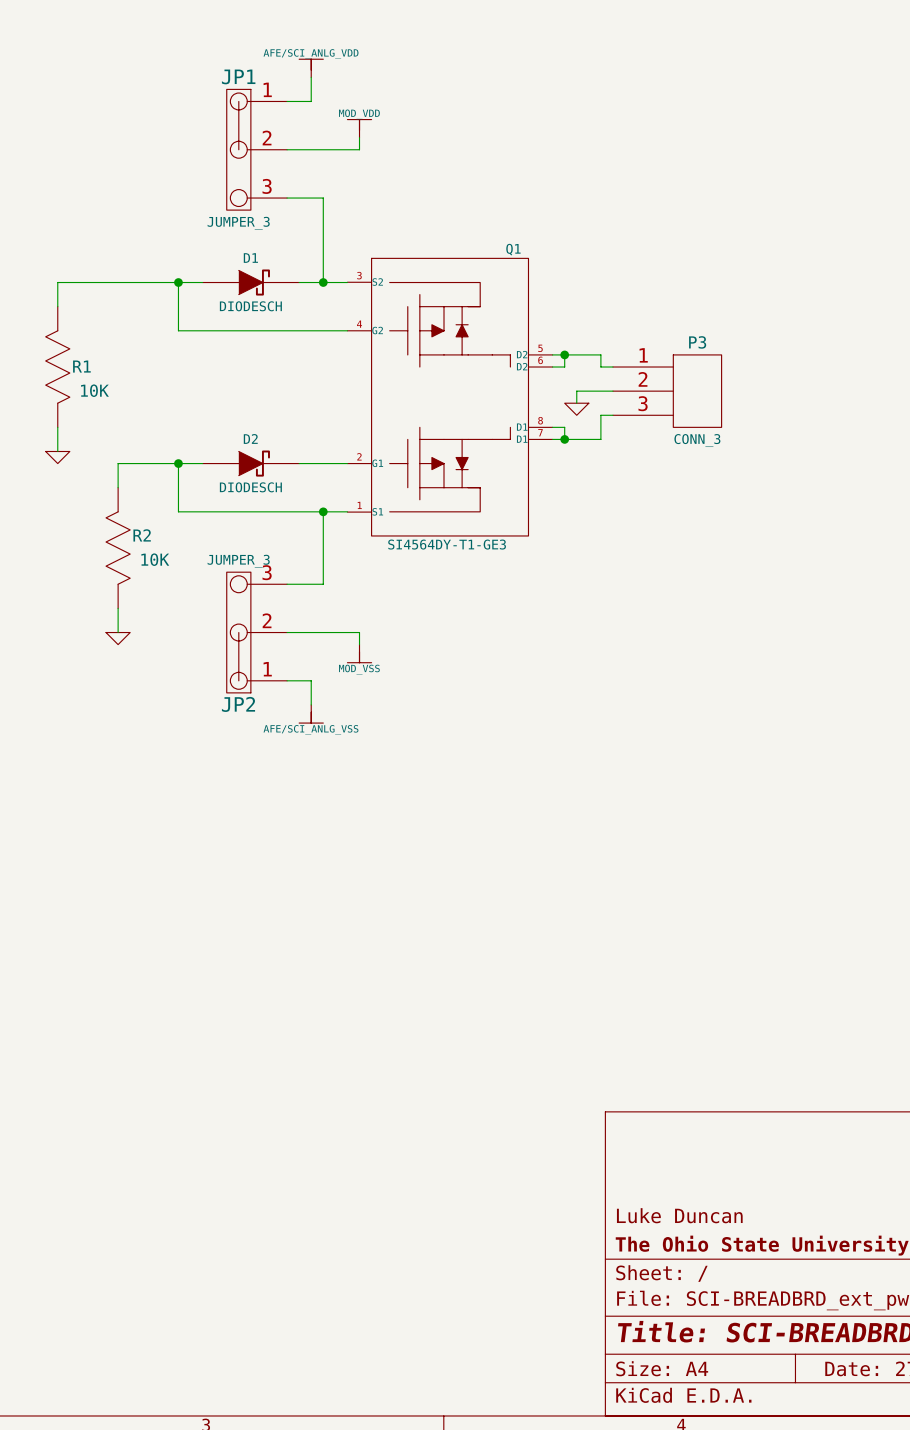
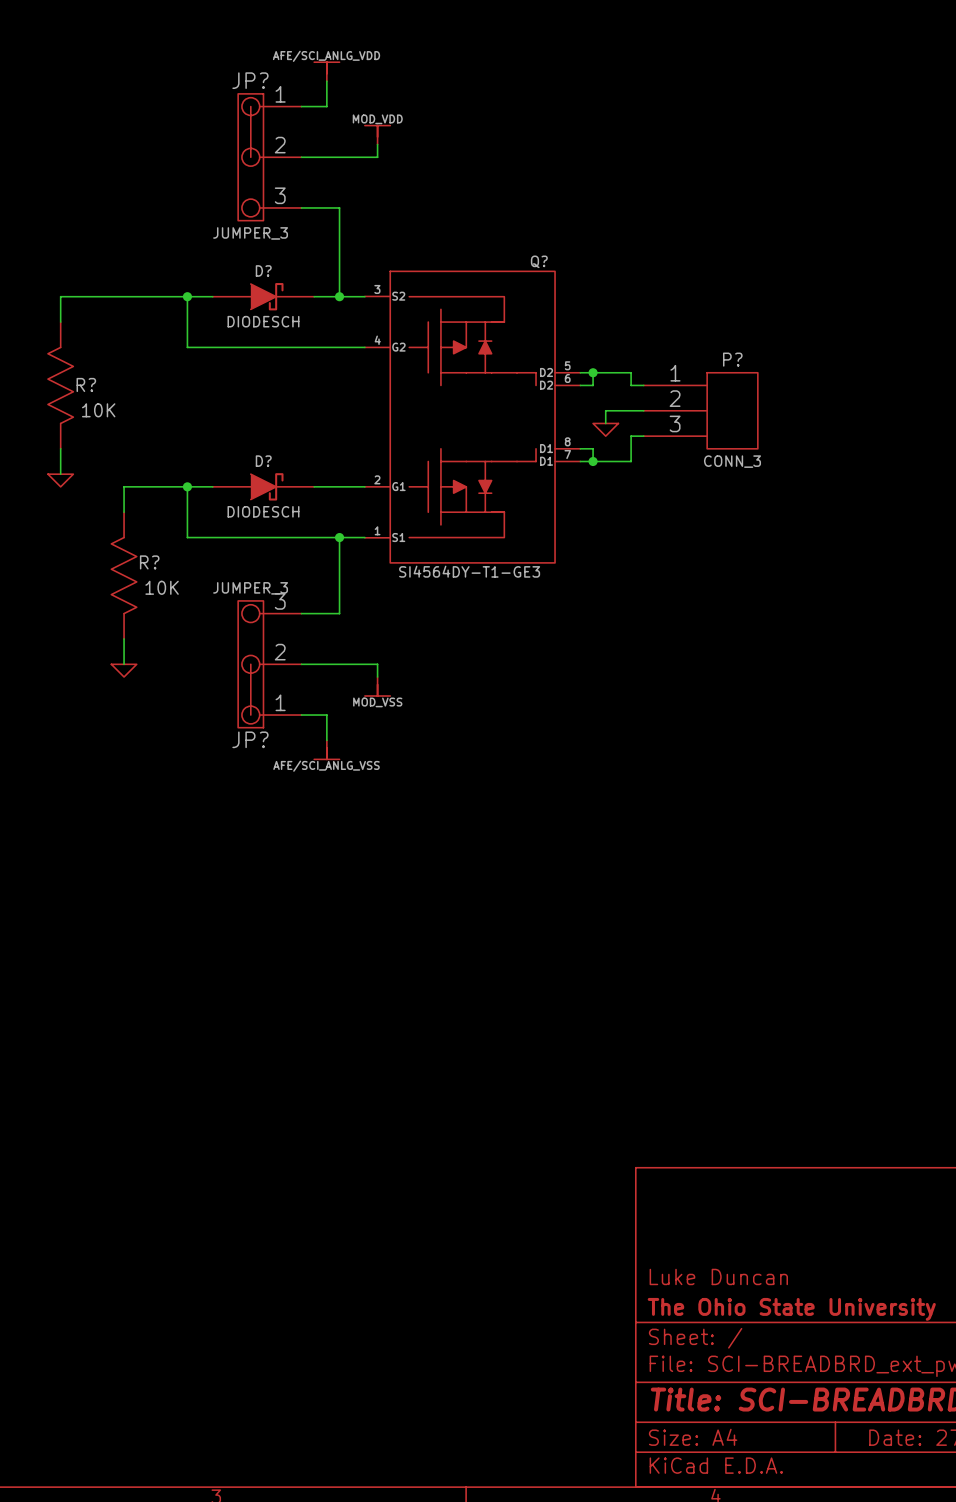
JP1 name: JP1 (238, 76) -> JP? (250, 80)
Q1 name: Q1 (513, 249) -> Q? (539, 261)
D1 name: D1 (250, 258) -> D? (263, 270)
P3 name: P3 (697, 342) -> P? (732, 359)
R1 name: R1 (81, 366) -> R? (86, 384)
D2 name: D2 (250, 438) -> D? (263, 461)
R2 name: R2 (142, 535) -> R? (149, 562)
JP2 name: JP2 (238, 704) -> JP? (250, 739)

